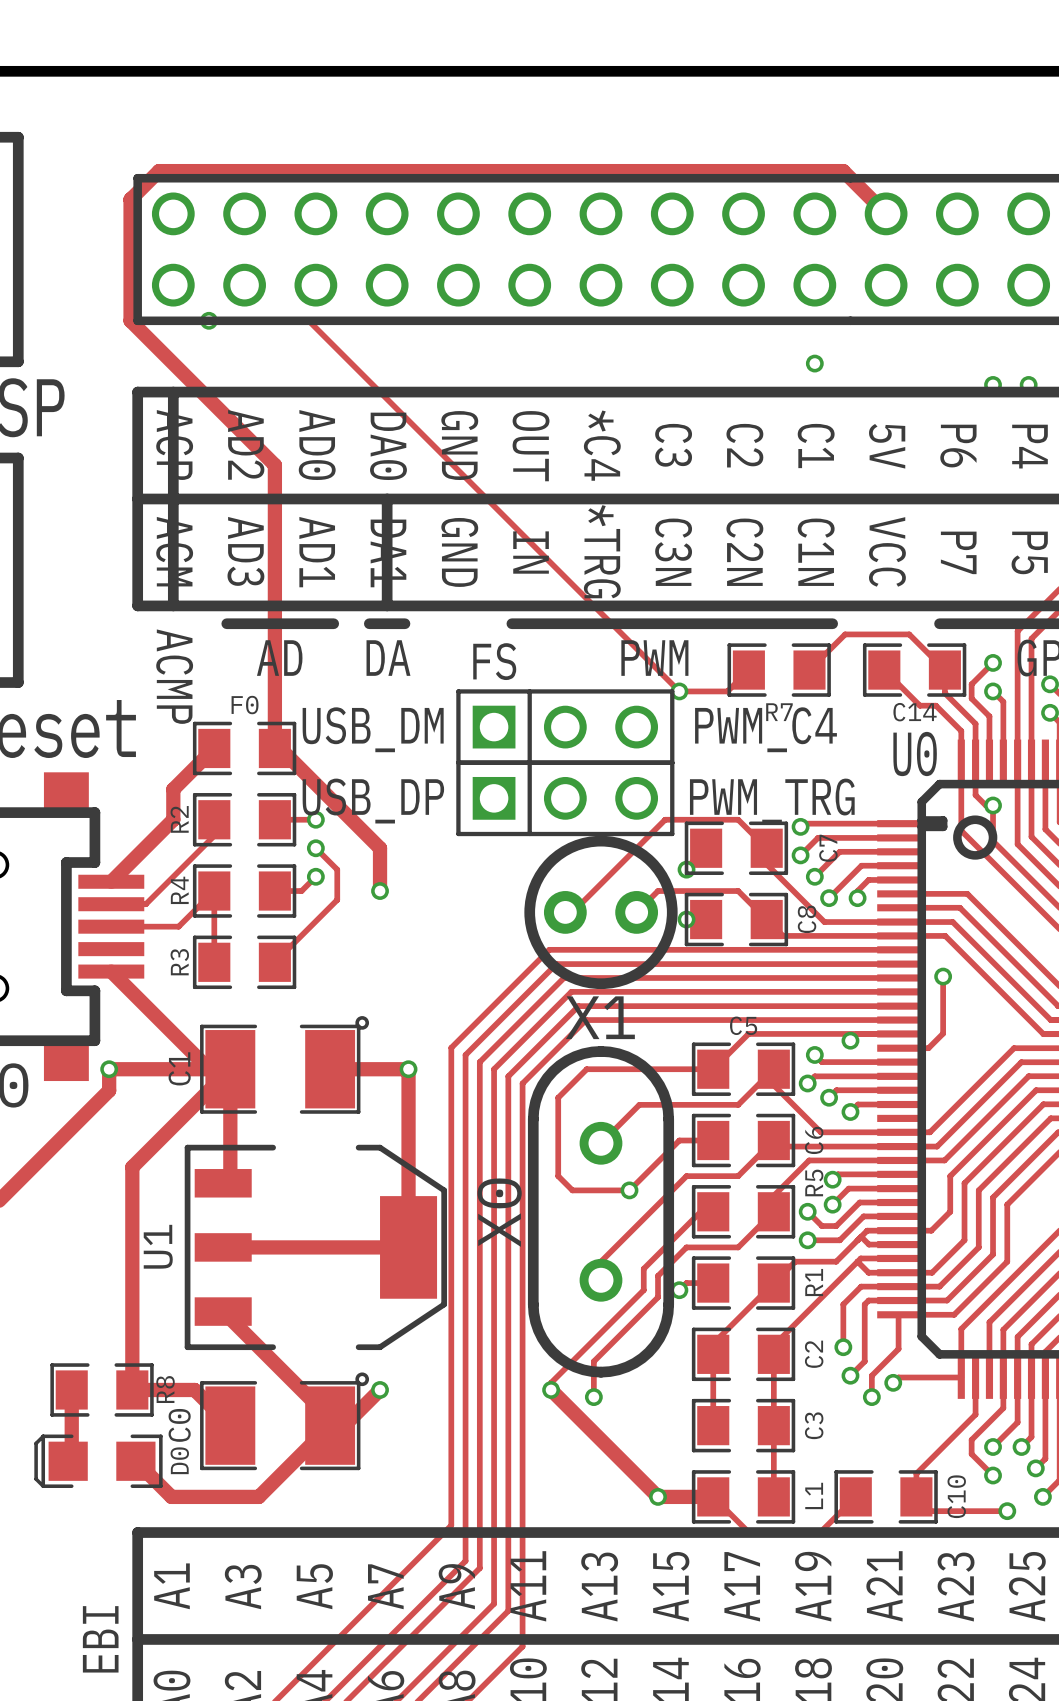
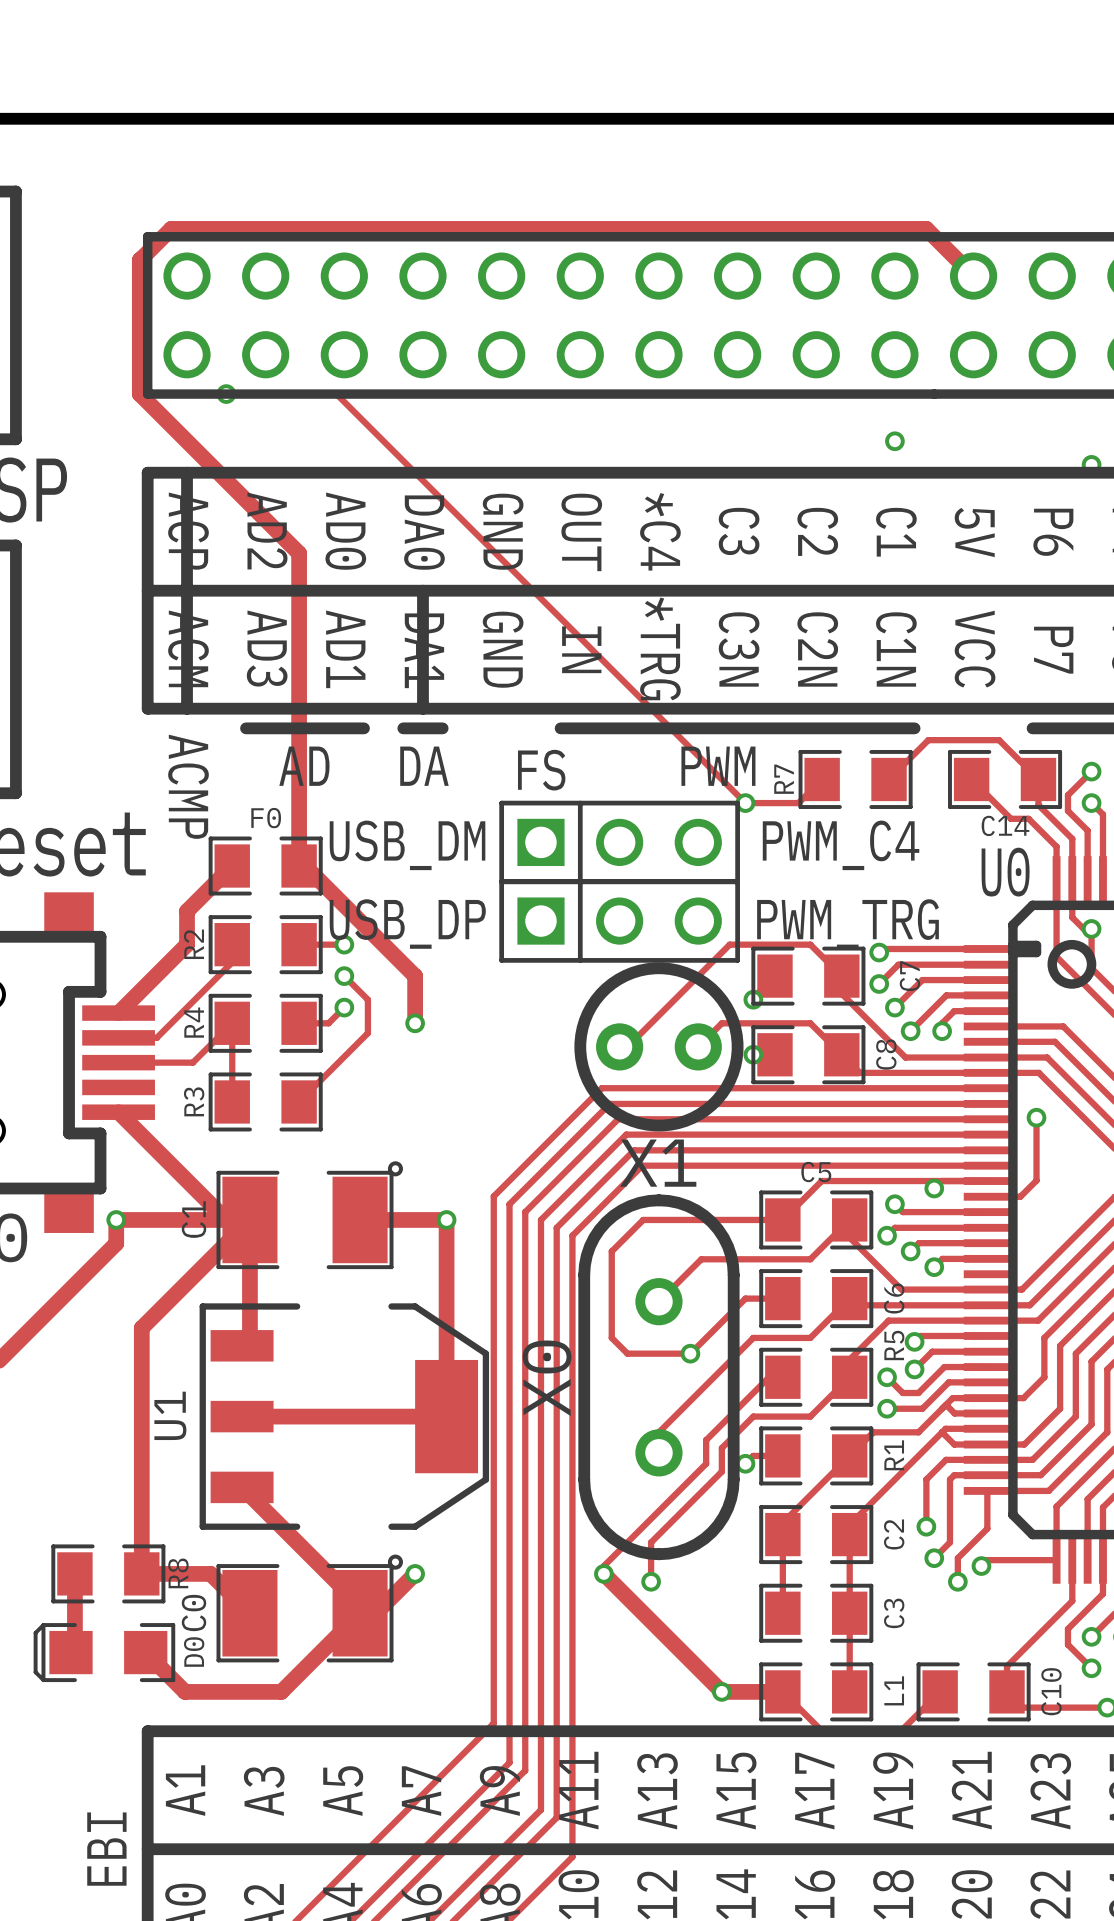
R7 name rotation: 0° (779, 712) -> 90° counterclockwise (784, 779)
R7 name position: R7 (779, 712) -> R7 (784, 779)

